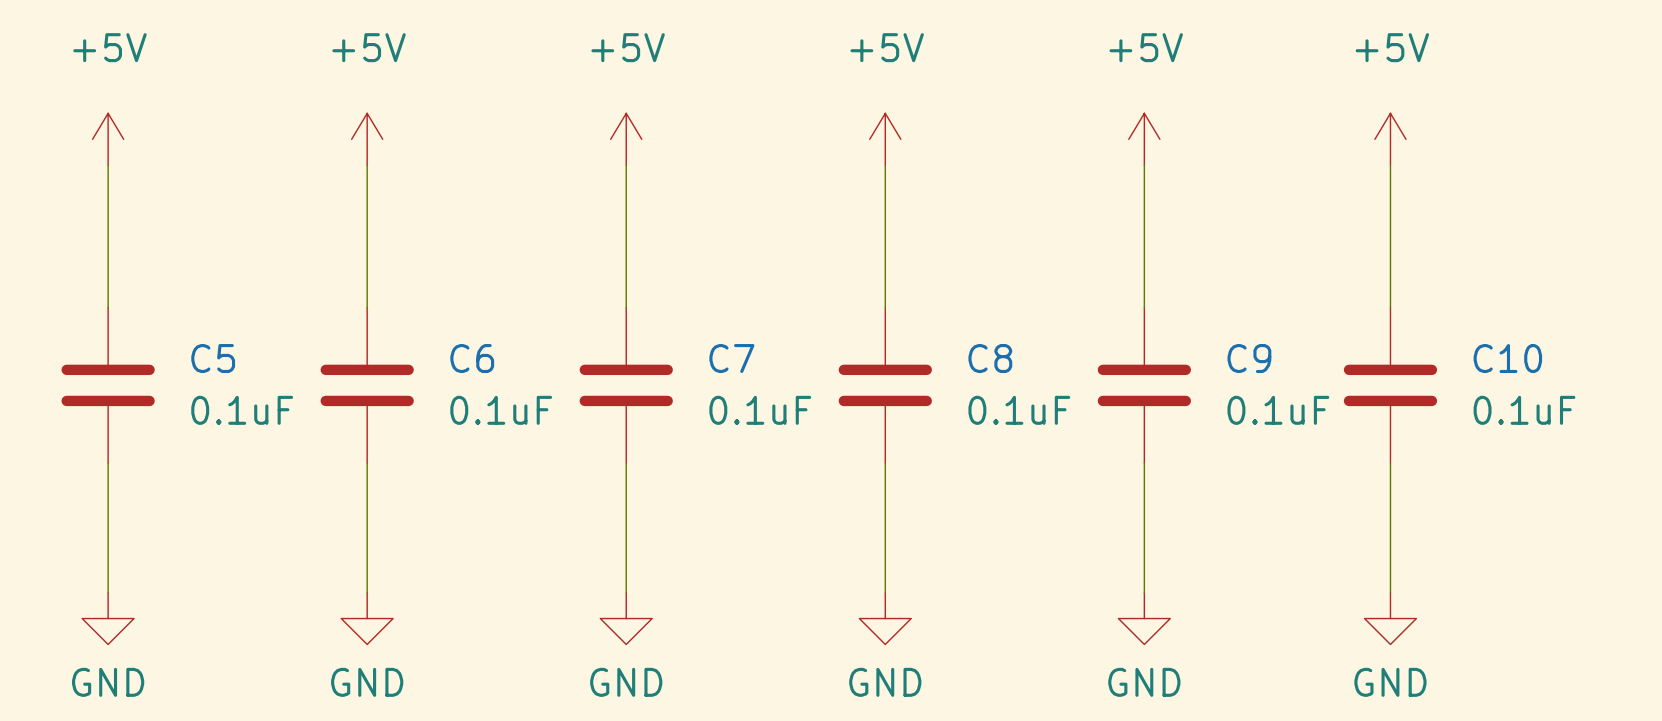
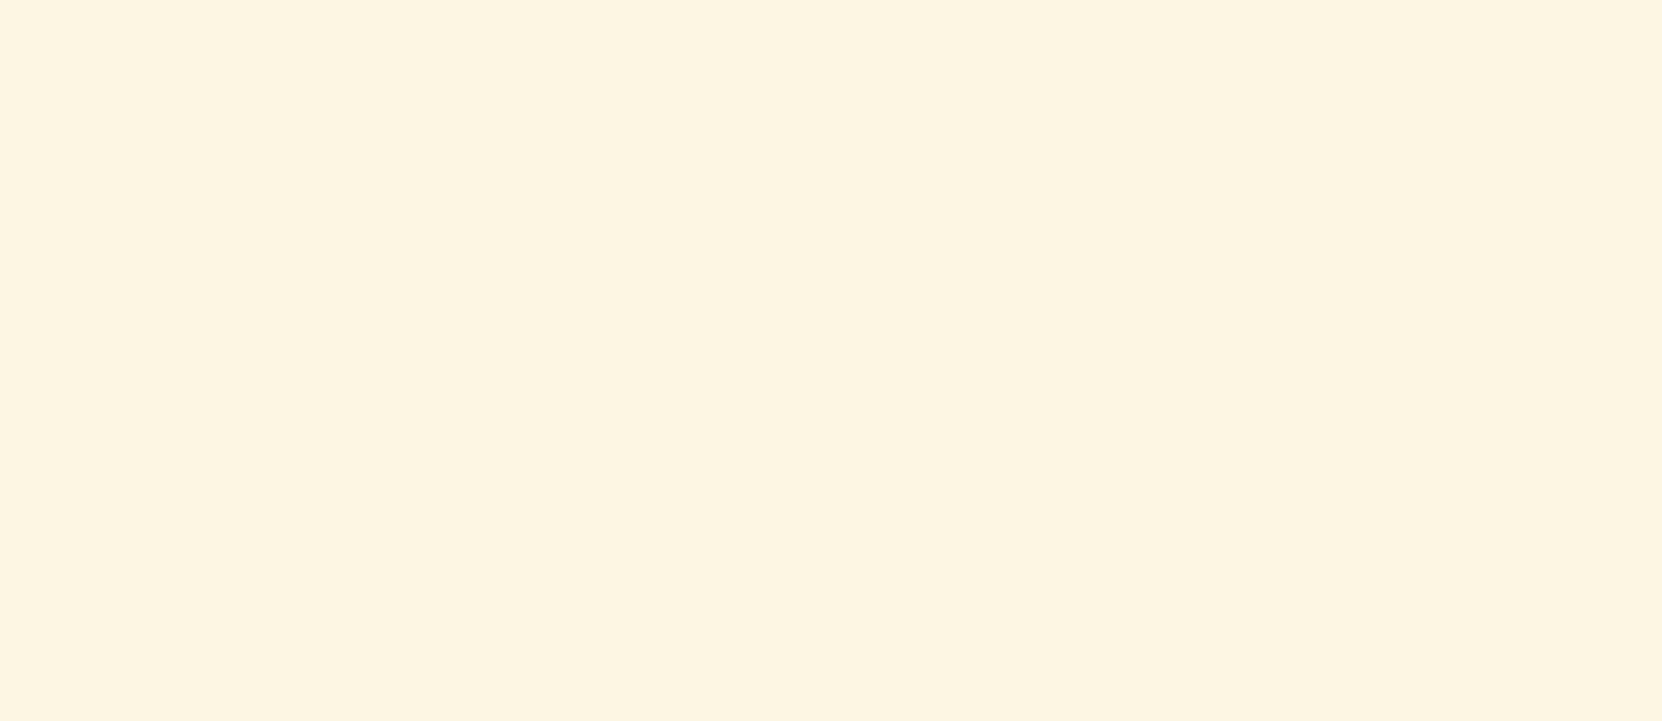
power symbol: +5V (108, 139) -> none
power symbol: +5V (367, 139) -> none
power symbol: +5V (626, 139) -> none
power symbol: +5V (885, 139) -> none
power symbol: +5V (1144, 139) -> none
power symbol: +5V (1390, 139) -> none
wire: (108, 165) (108, 307) -> none
wire: (367, 165) (367, 307) -> none
wire: (626, 165) (626, 307) -> none
wire: (885, 165) (885, 307) -> none
wire: (1144, 165) (1144, 307) -> none
wire: (1390, 165) (1390, 307) -> none
C5: 0.1uF (108, 385) -> none
C6: 0.1uF (367, 385) -> none
C7: 0.1uF (626, 385) -> none
C8: 0.1uF (885, 385) -> none
C9: 0.1uF (1144, 385) -> none
C10: 0.1uF (1390, 385) -> none
wire: (108, 463) (108, 592) -> none
wire: (367, 463) (367, 592) -> none
wire: (626, 463) (626, 592) -> none
wire: (885, 463) (885, 592) -> none
wire: (1144, 463) (1144, 592) -> none
wire: (1390, 463) (1390, 592) -> none
power symbol: GND (108, 618) -> none
power symbol: GND (367, 618) -> none
power symbol: GND (626, 618) -> none
power symbol: GND (885, 618) -> none
power symbol: GND (1144, 618) -> none
power symbol: GND (1390, 618) -> none

